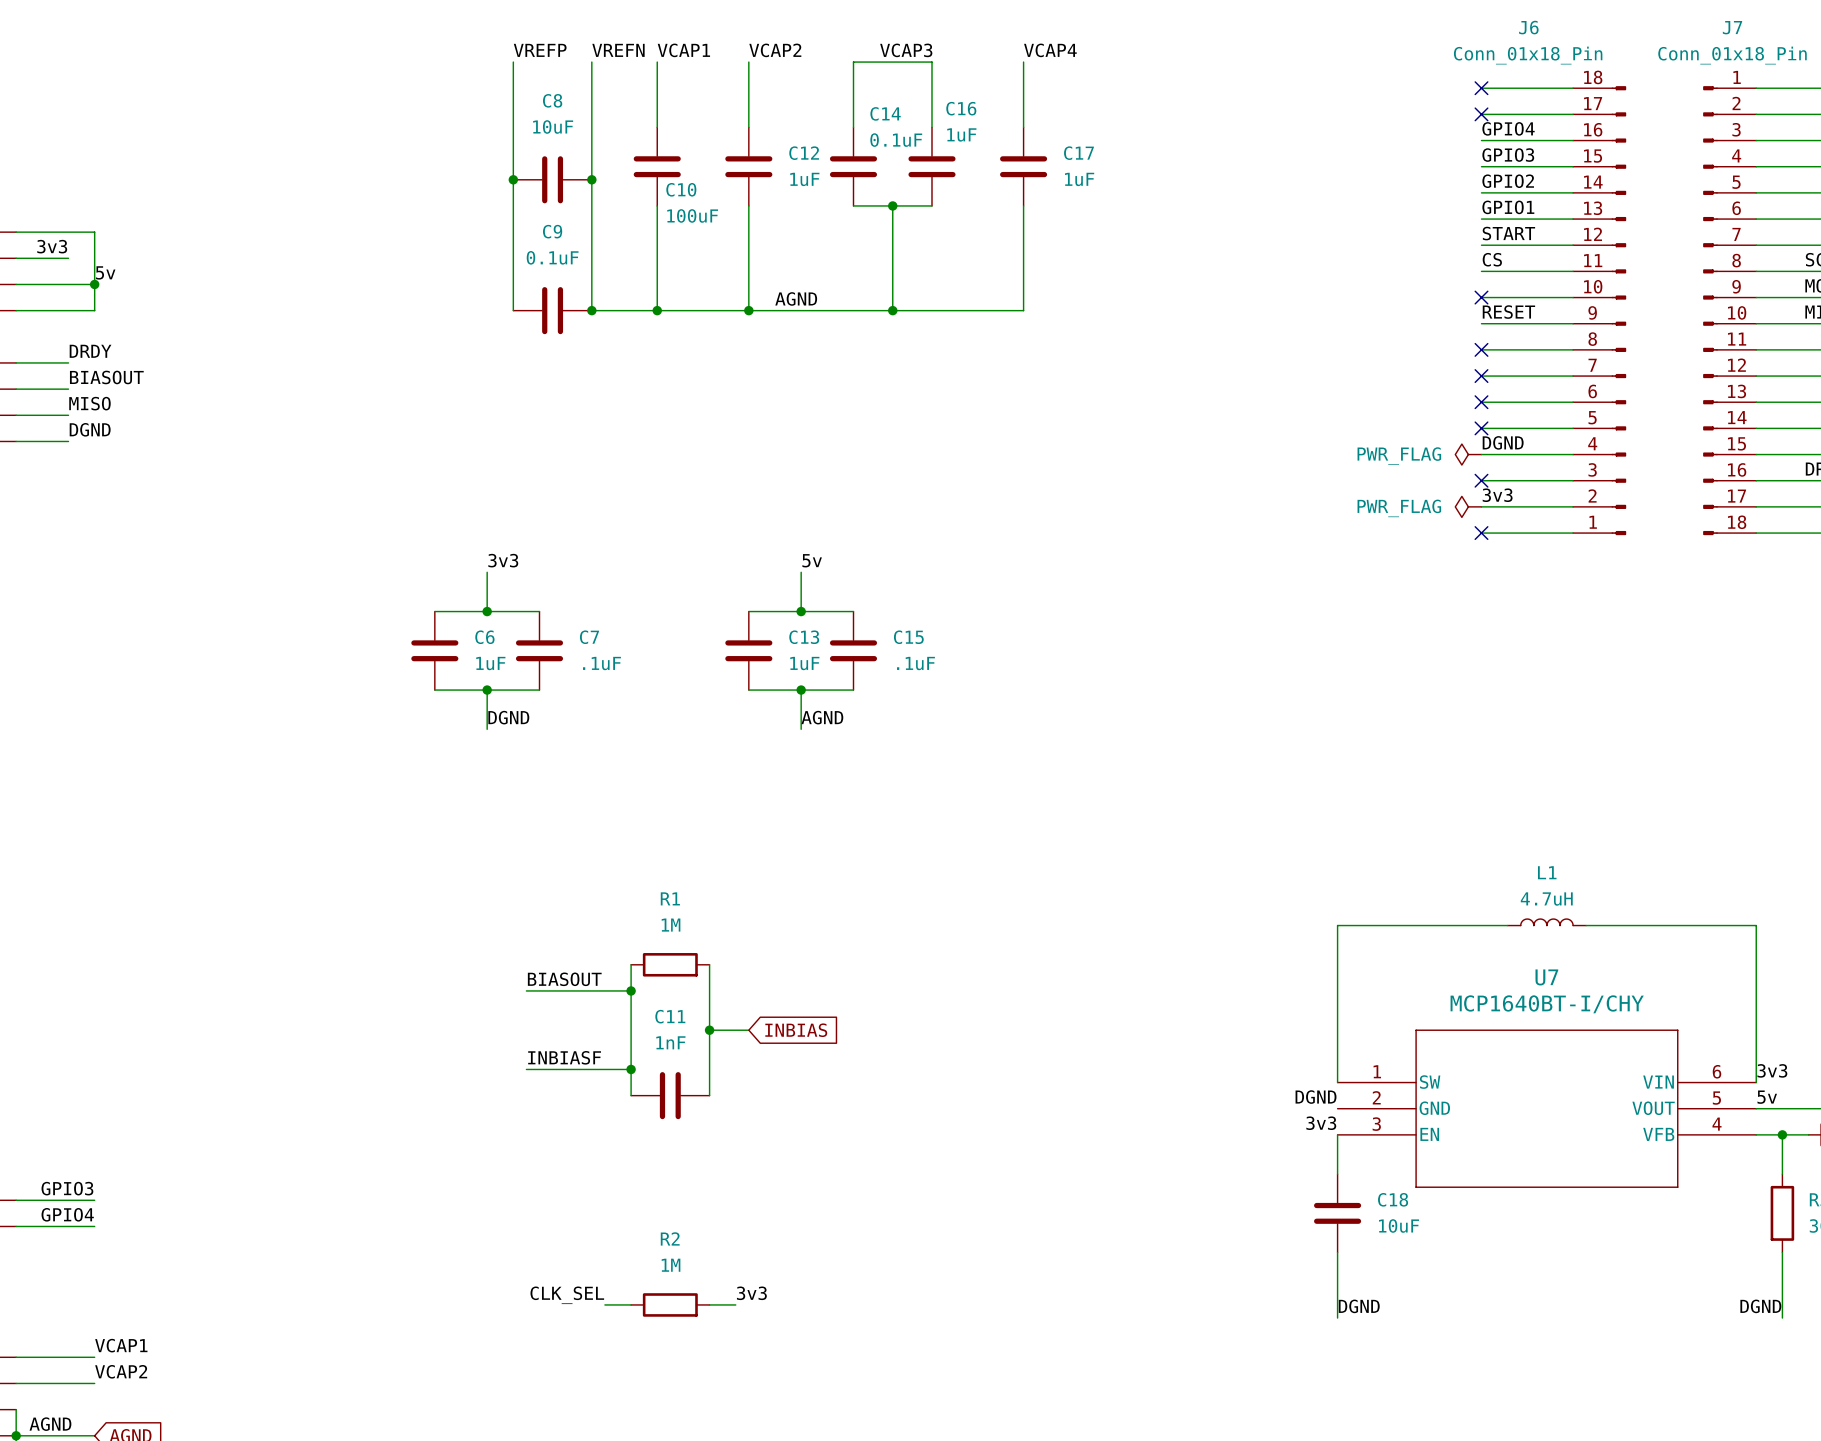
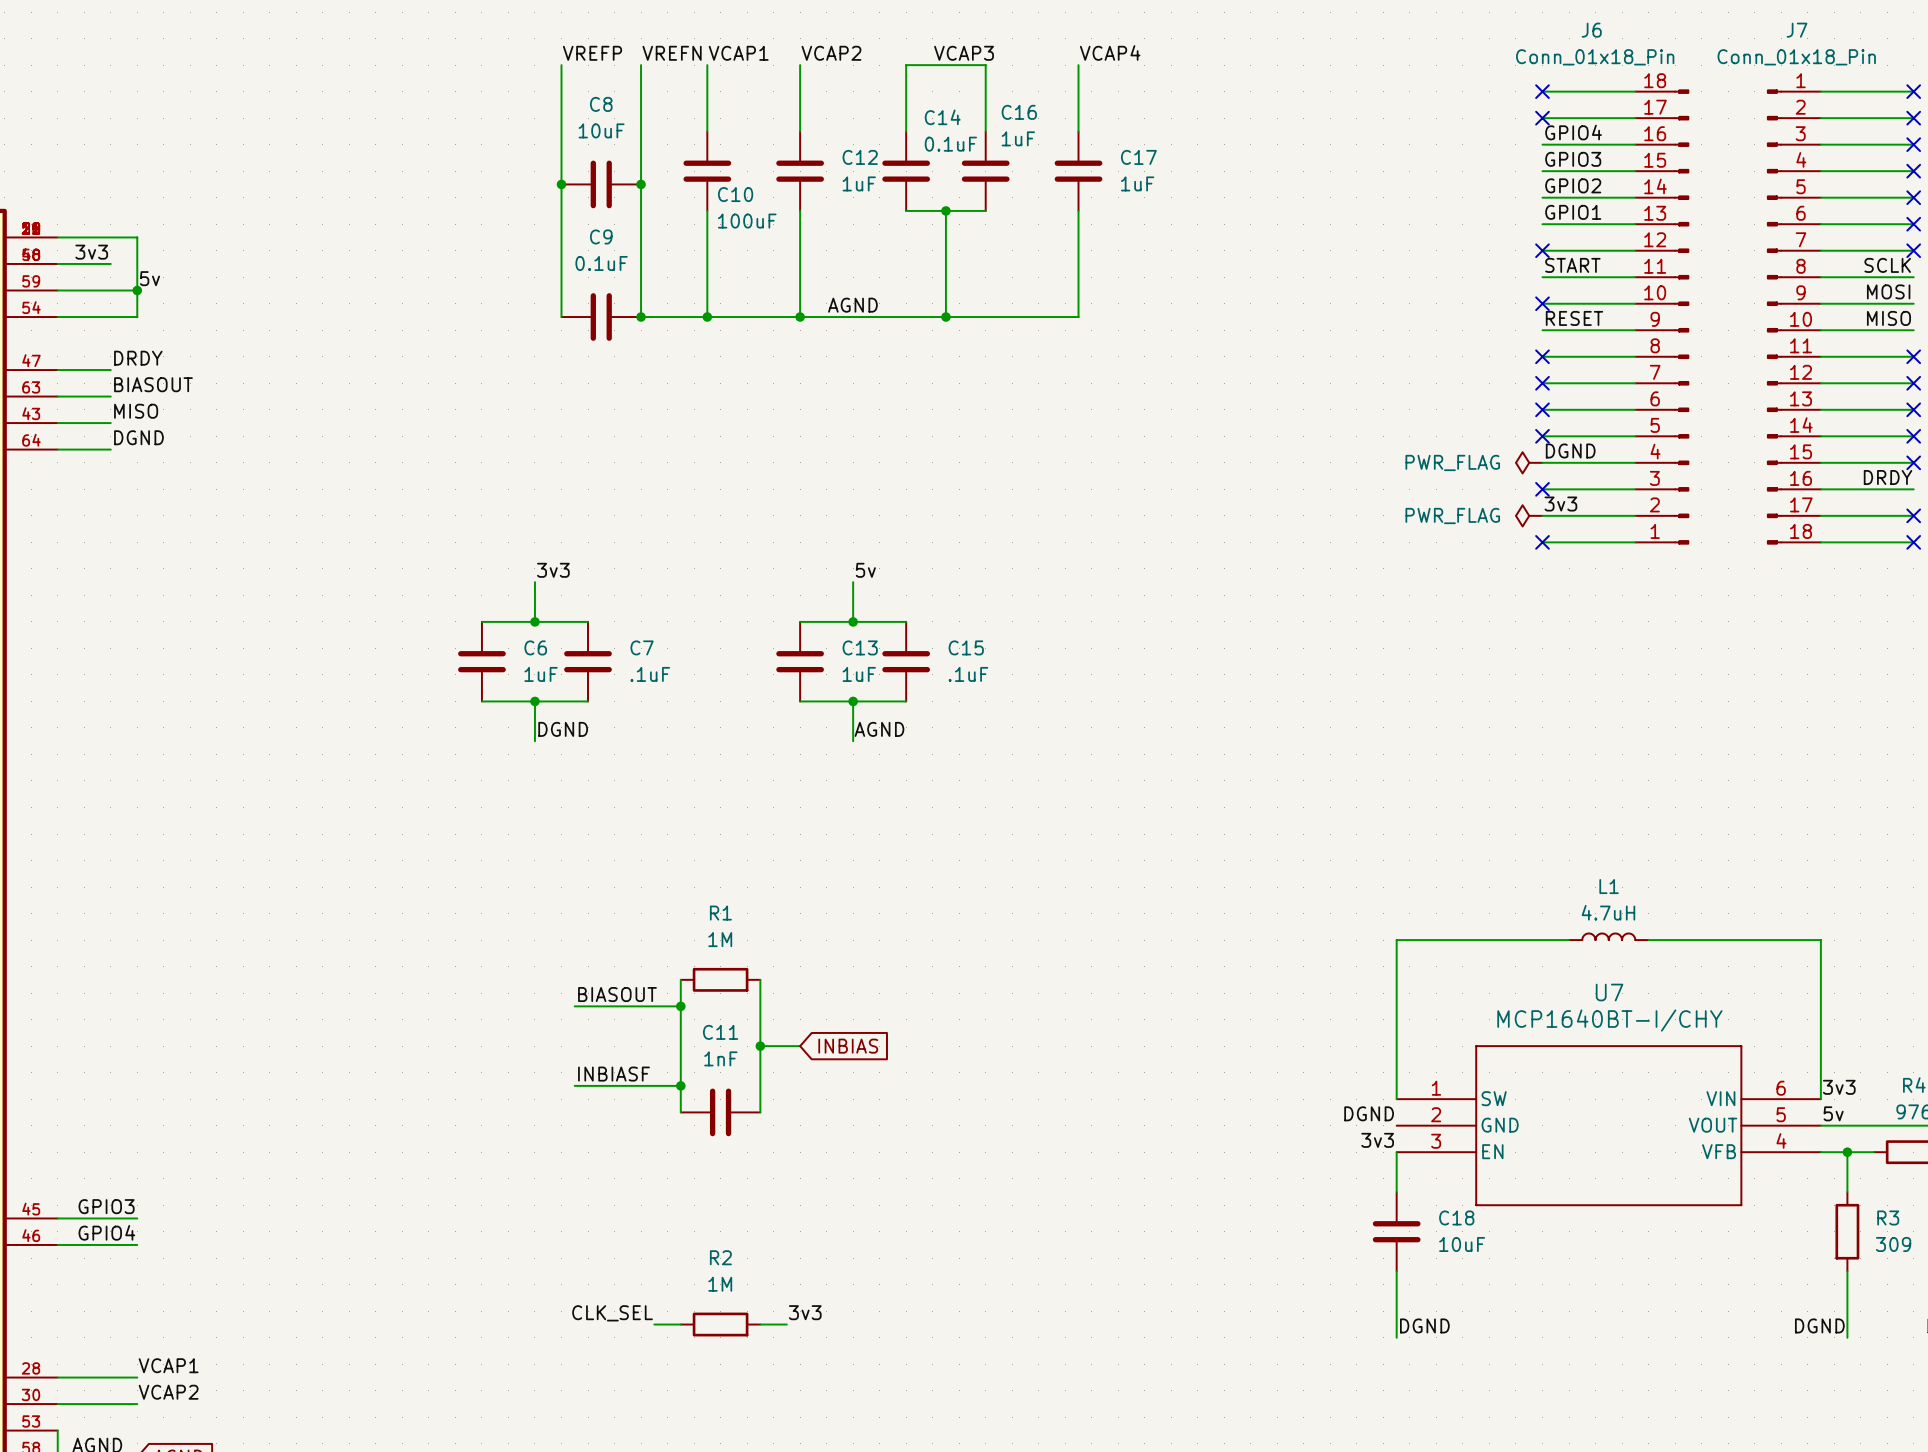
label: START (1508, 233) -> none
no-connect mark: none -> (1542, 250)
label: CS (1492, 259) -> START (1572, 265)

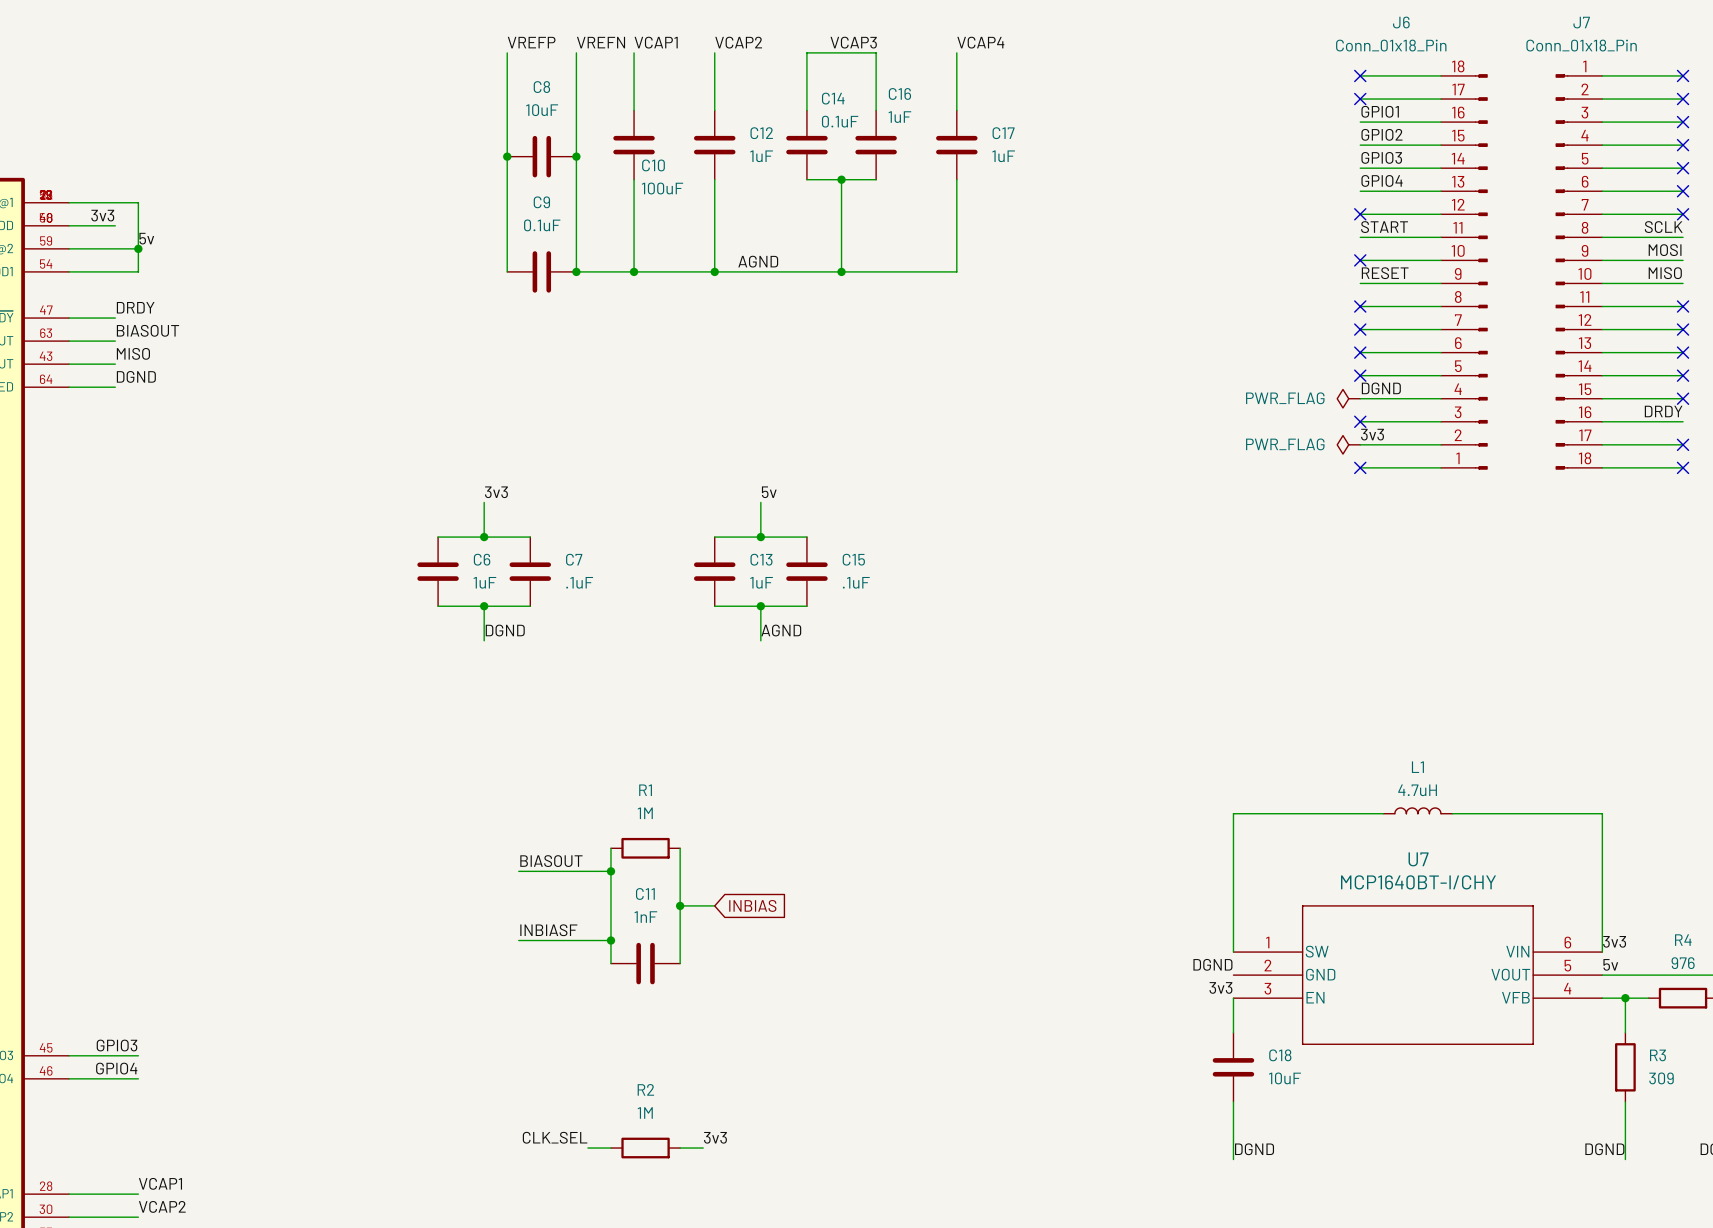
label: GPIO4 (1573, 132) -> GPIO1 (1380, 111)
label: GPIO3 (1573, 159) -> GPIO2 (1381, 134)
label: GPIO2 (1573, 185) -> GPIO3 (1381, 157)
label: GPIO1 (1573, 212) -> GPIO4 (1382, 180)

